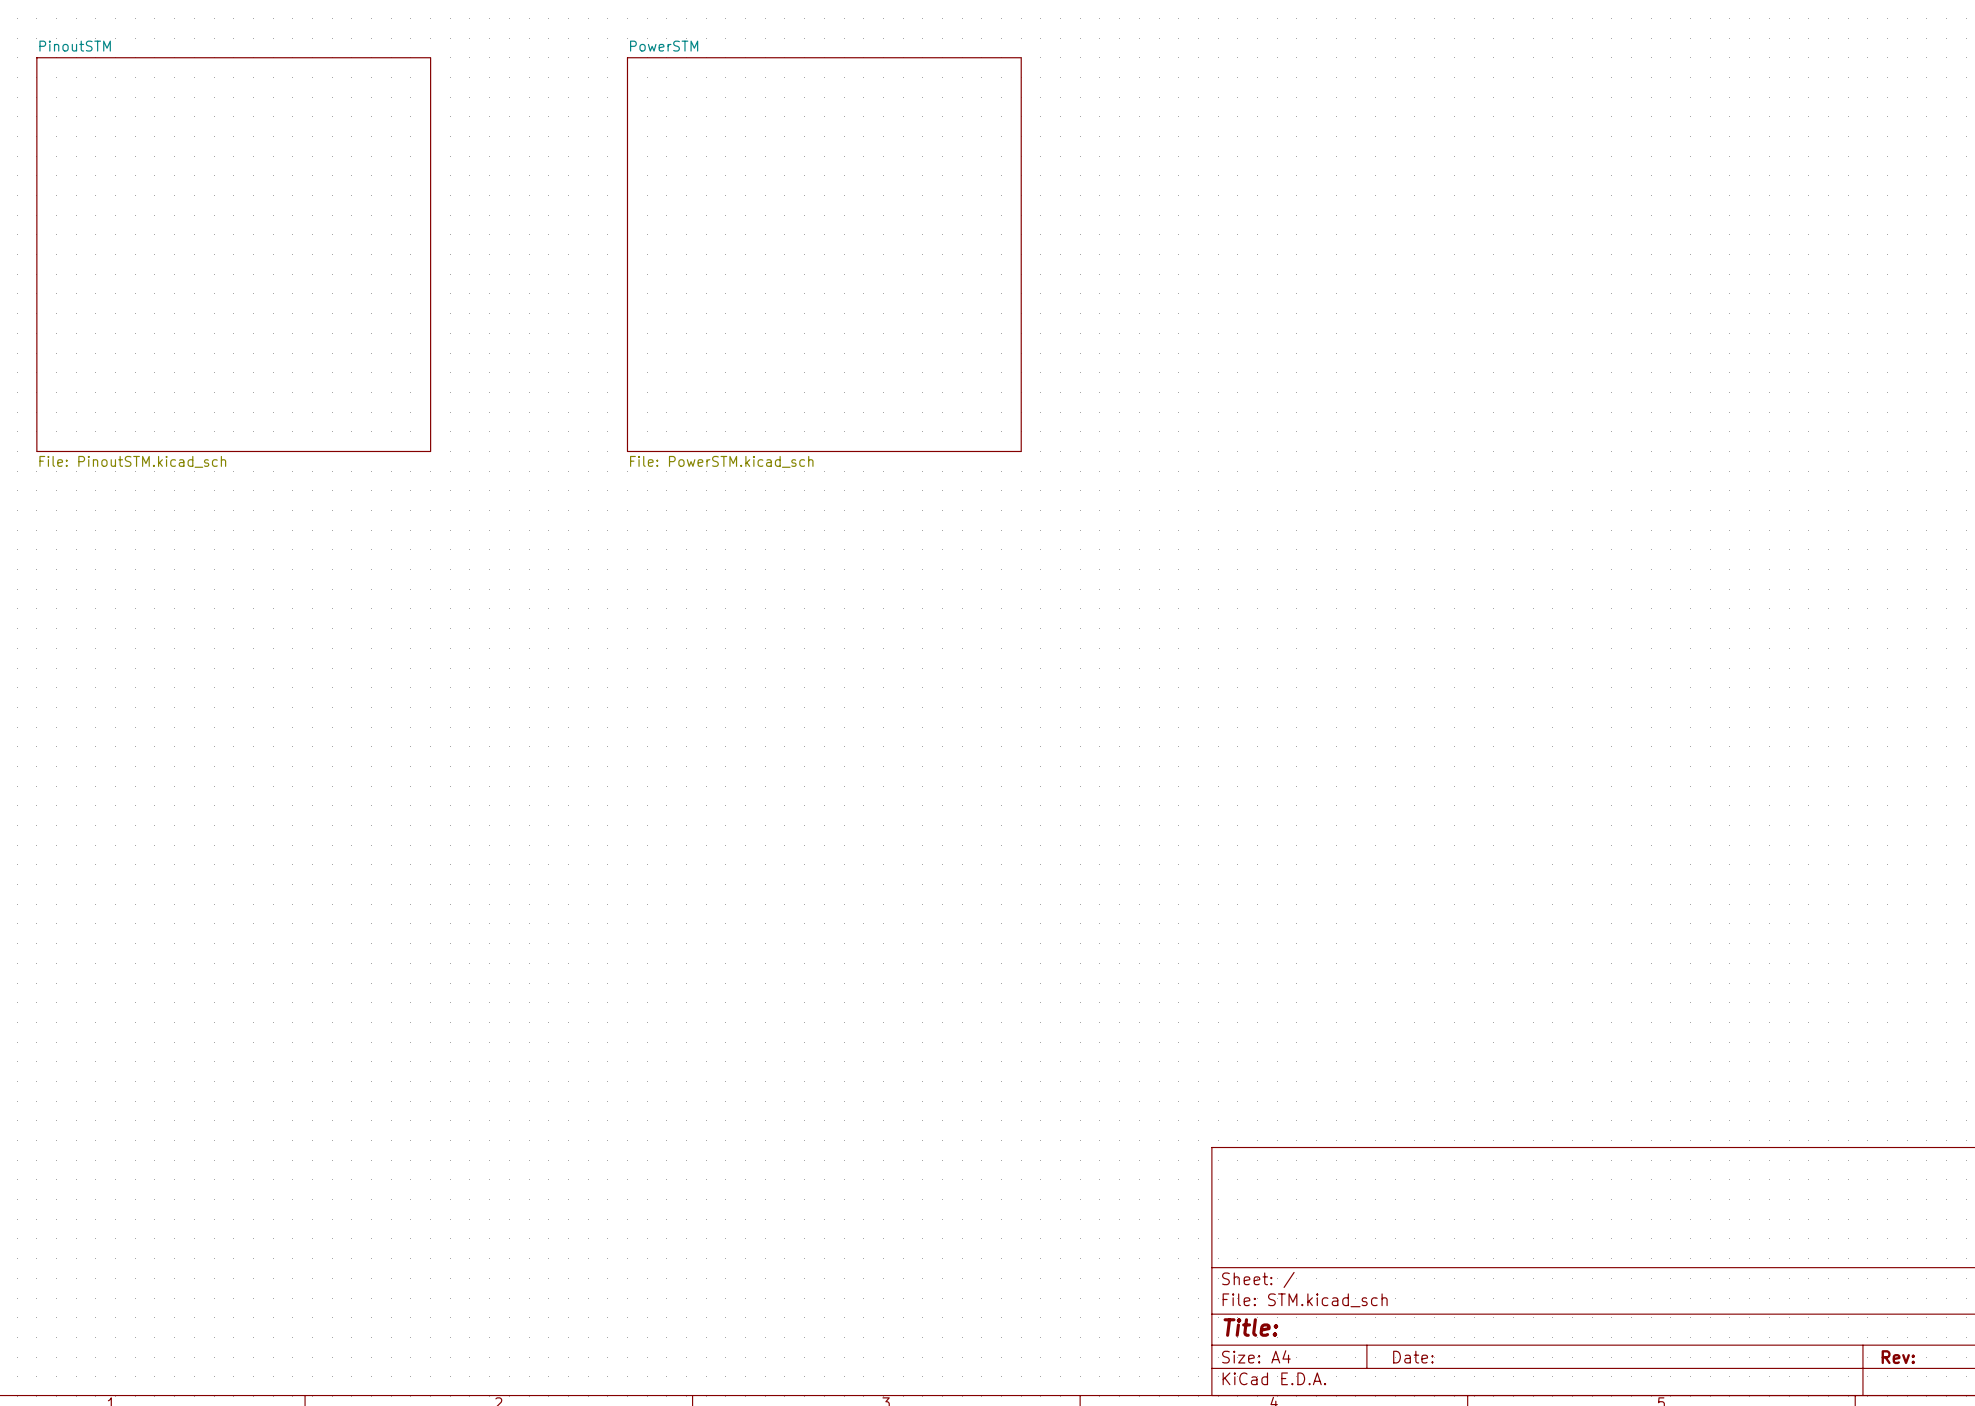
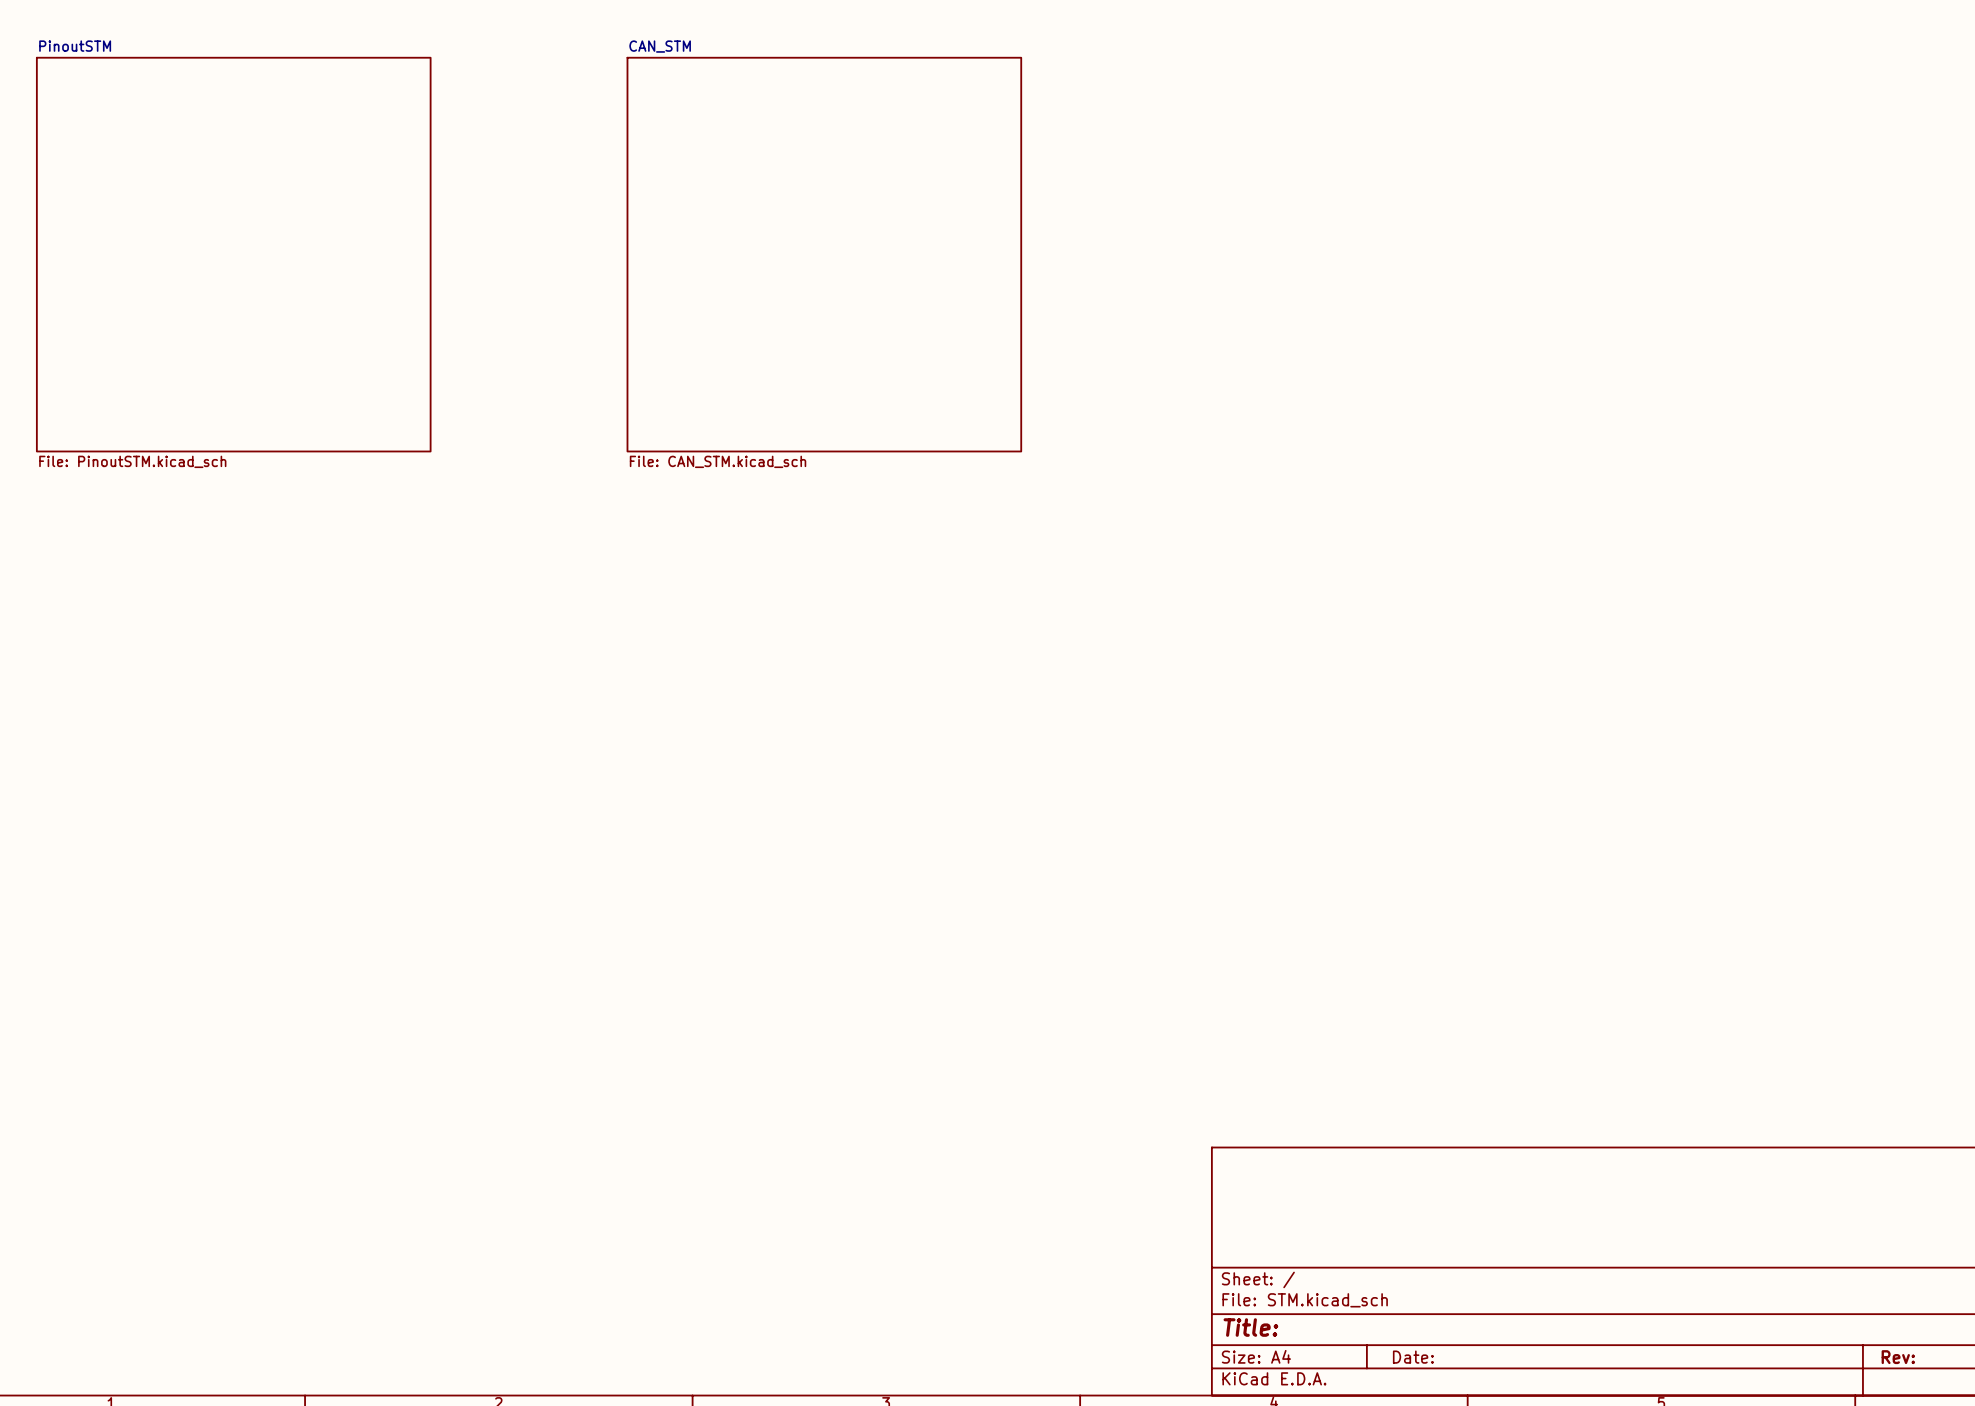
sheet PowerSTM name: PowerSTM (664, 46) -> CAN_STM (660, 46)
sheet PowerSTM value: File: PowerSTM.kicad_sch (721, 461) -> File: CAN_STM.kicad_sch (718, 461)

